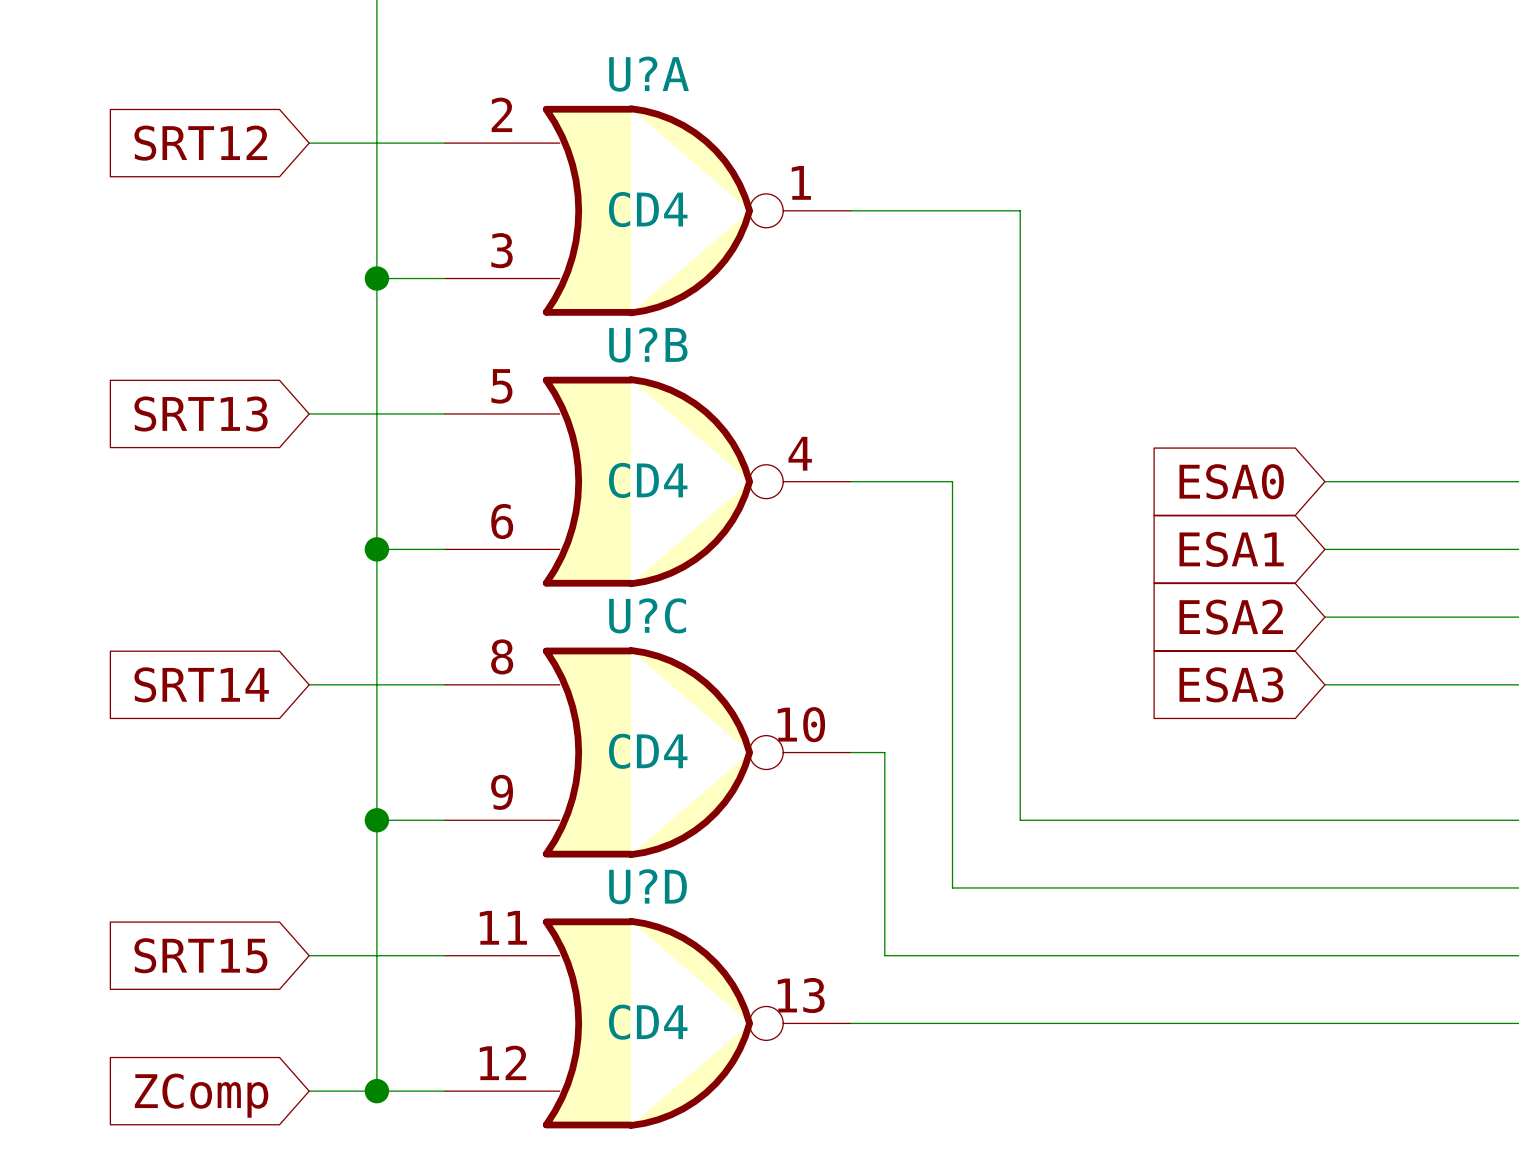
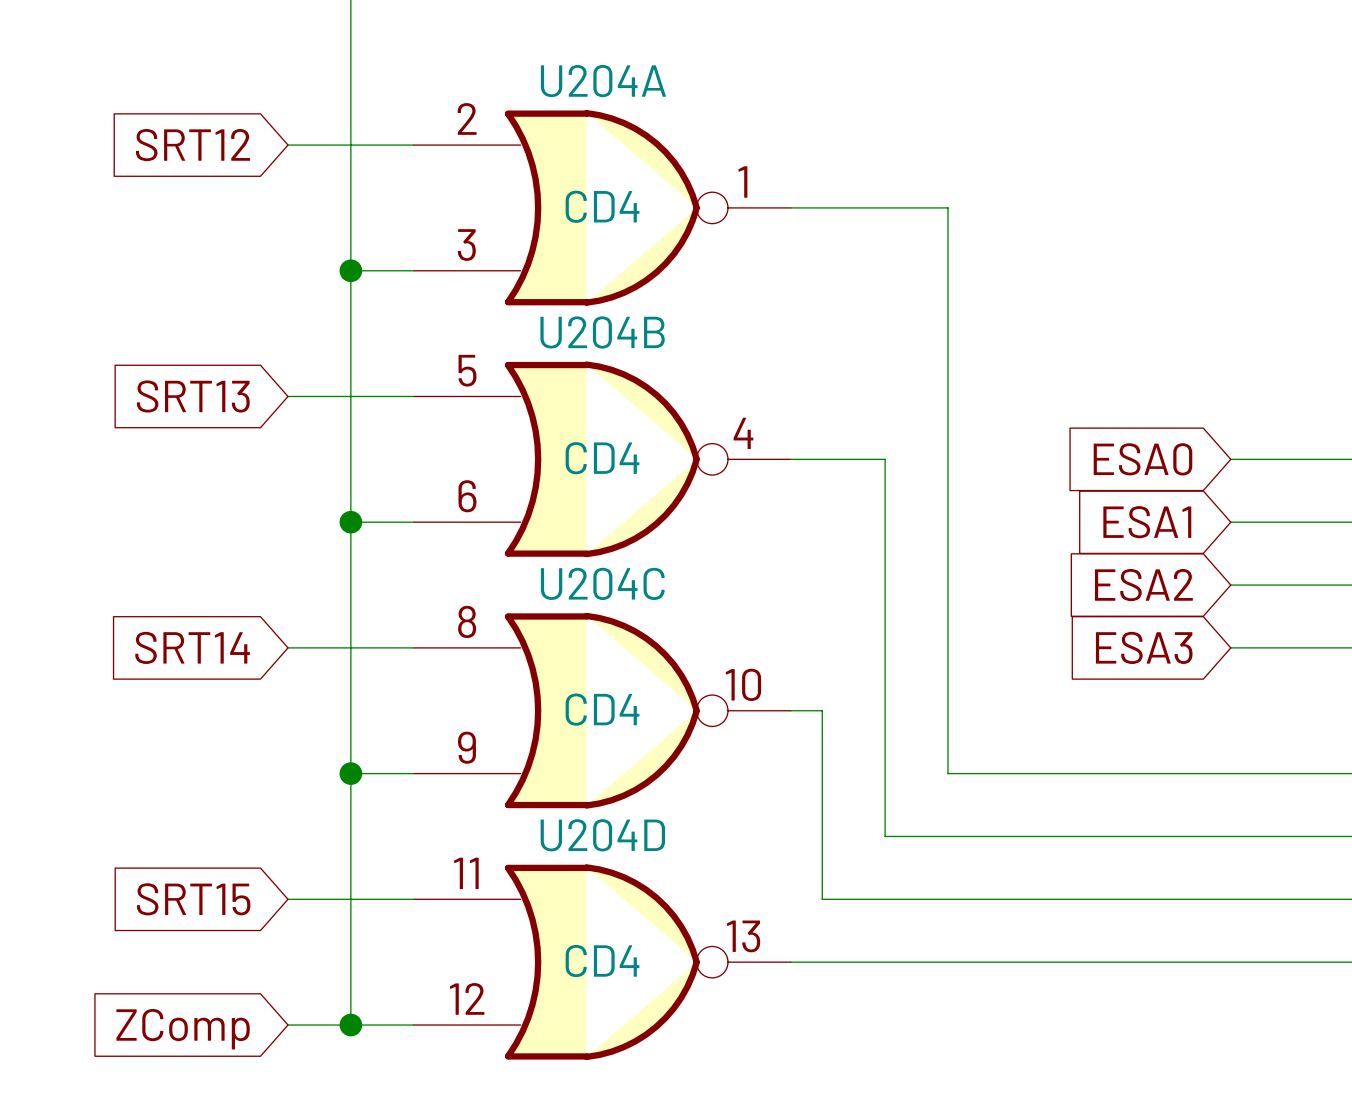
U?A name: U?A (649, 74) -> U204A (603, 81)
U?B name: U?B (648, 345) -> U204B (602, 332)
U?C name: U?C (647, 615) -> U204C (602, 583)
U?D name: U?D (648, 886) -> U204D (602, 835)

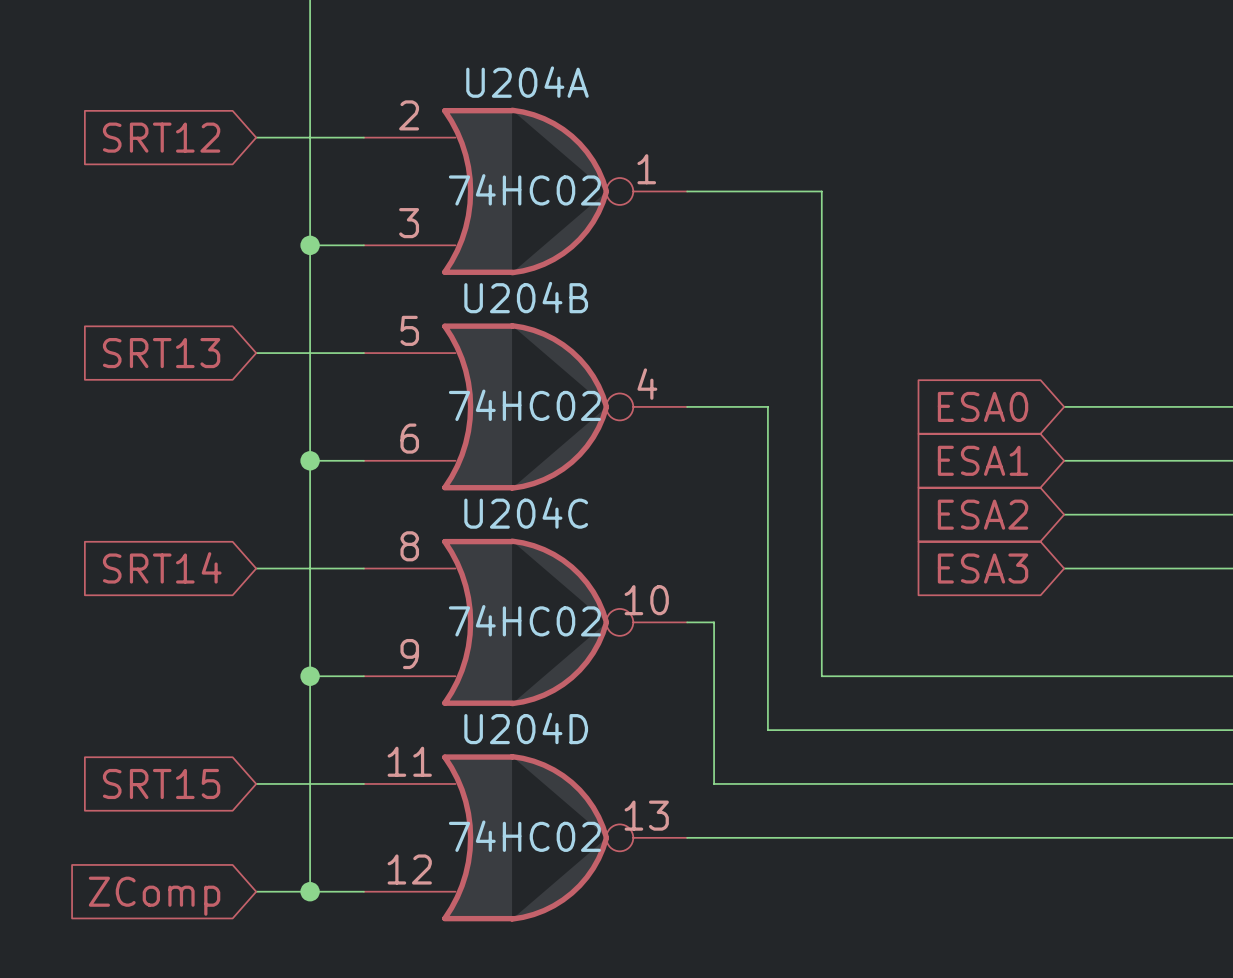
U204A value: CD4 (602, 206) -> 74HC02 (524, 189)
U204B value: CD4 (602, 458) -> 74HC02 (524, 405)
U204C value: CD4 (602, 709) -> 74HC02 (524, 620)
U204D value: CD4 (602, 961) -> 74HC02 (524, 836)

